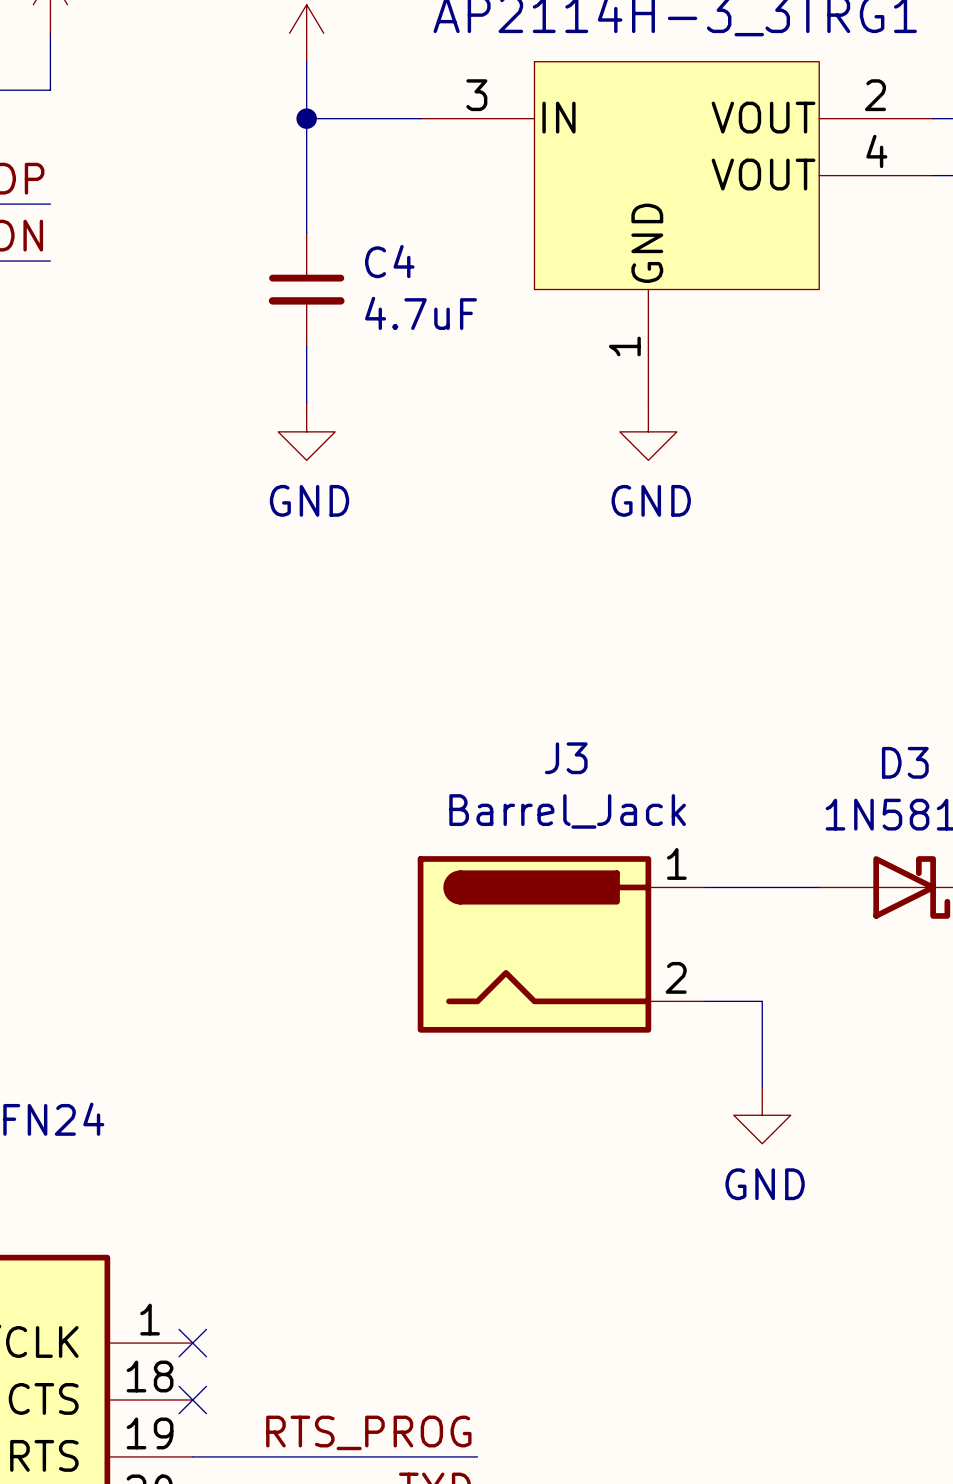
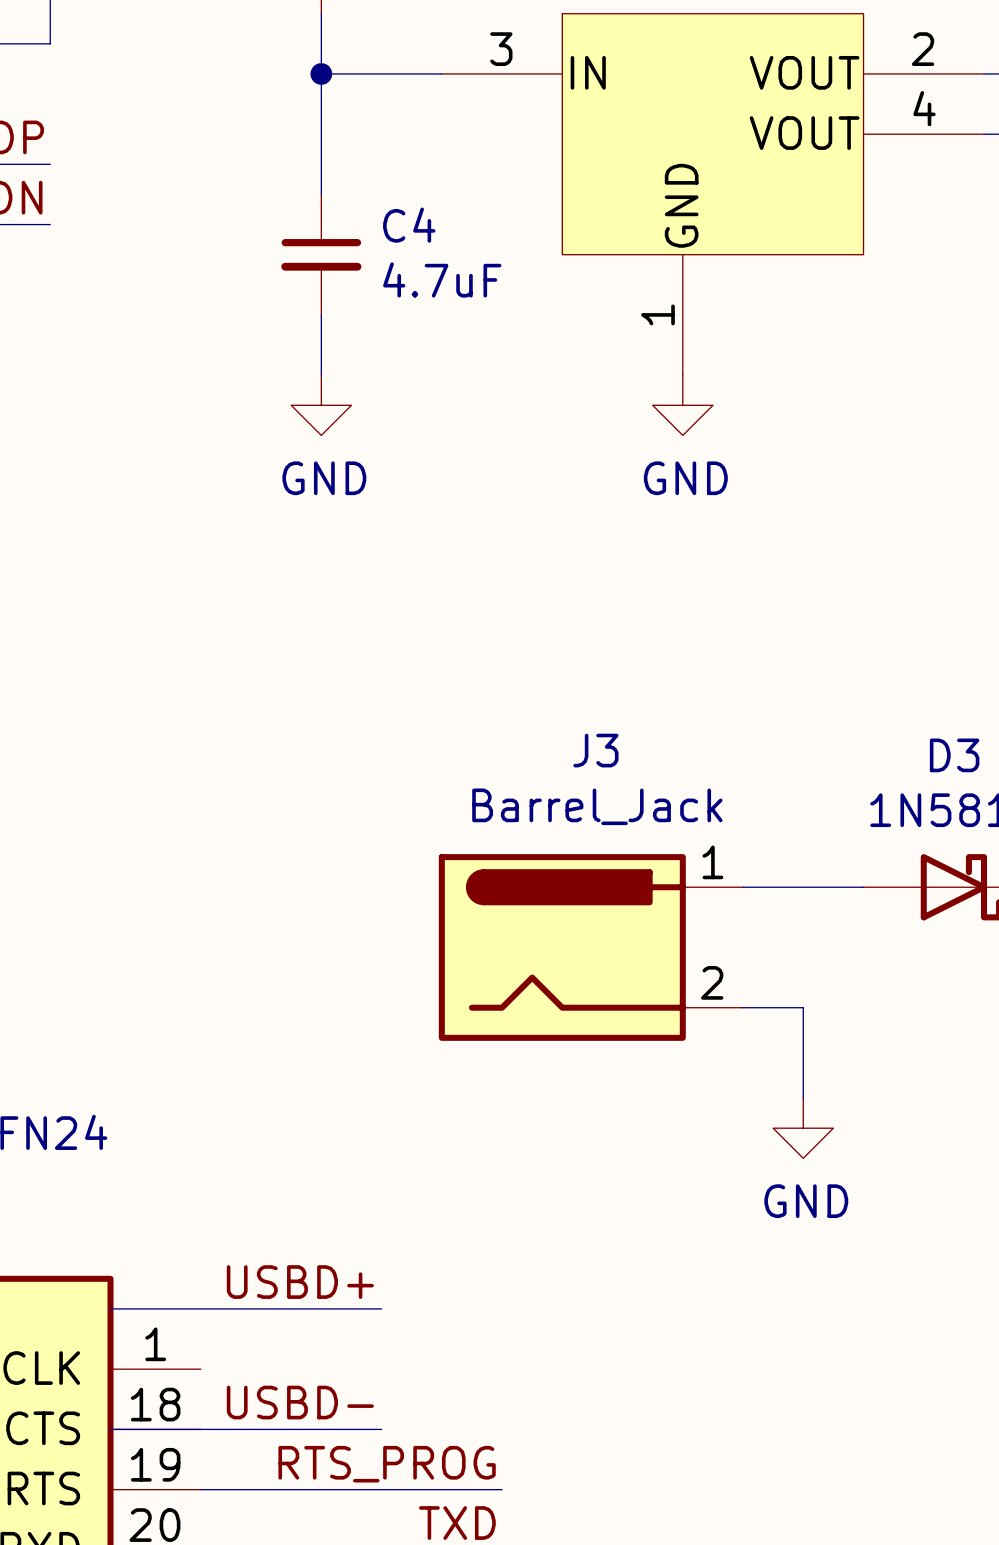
label: none -> USBD+ (300, 1282)
wire: none -> (110, 1308) (381, 1308)
no-connect mark: (192, 1343) -> none
label: none -> USBD- (300, 1402)
wire: none -> (110, 1429) (381, 1429)
no-connect mark: (192, 1400) -> none

